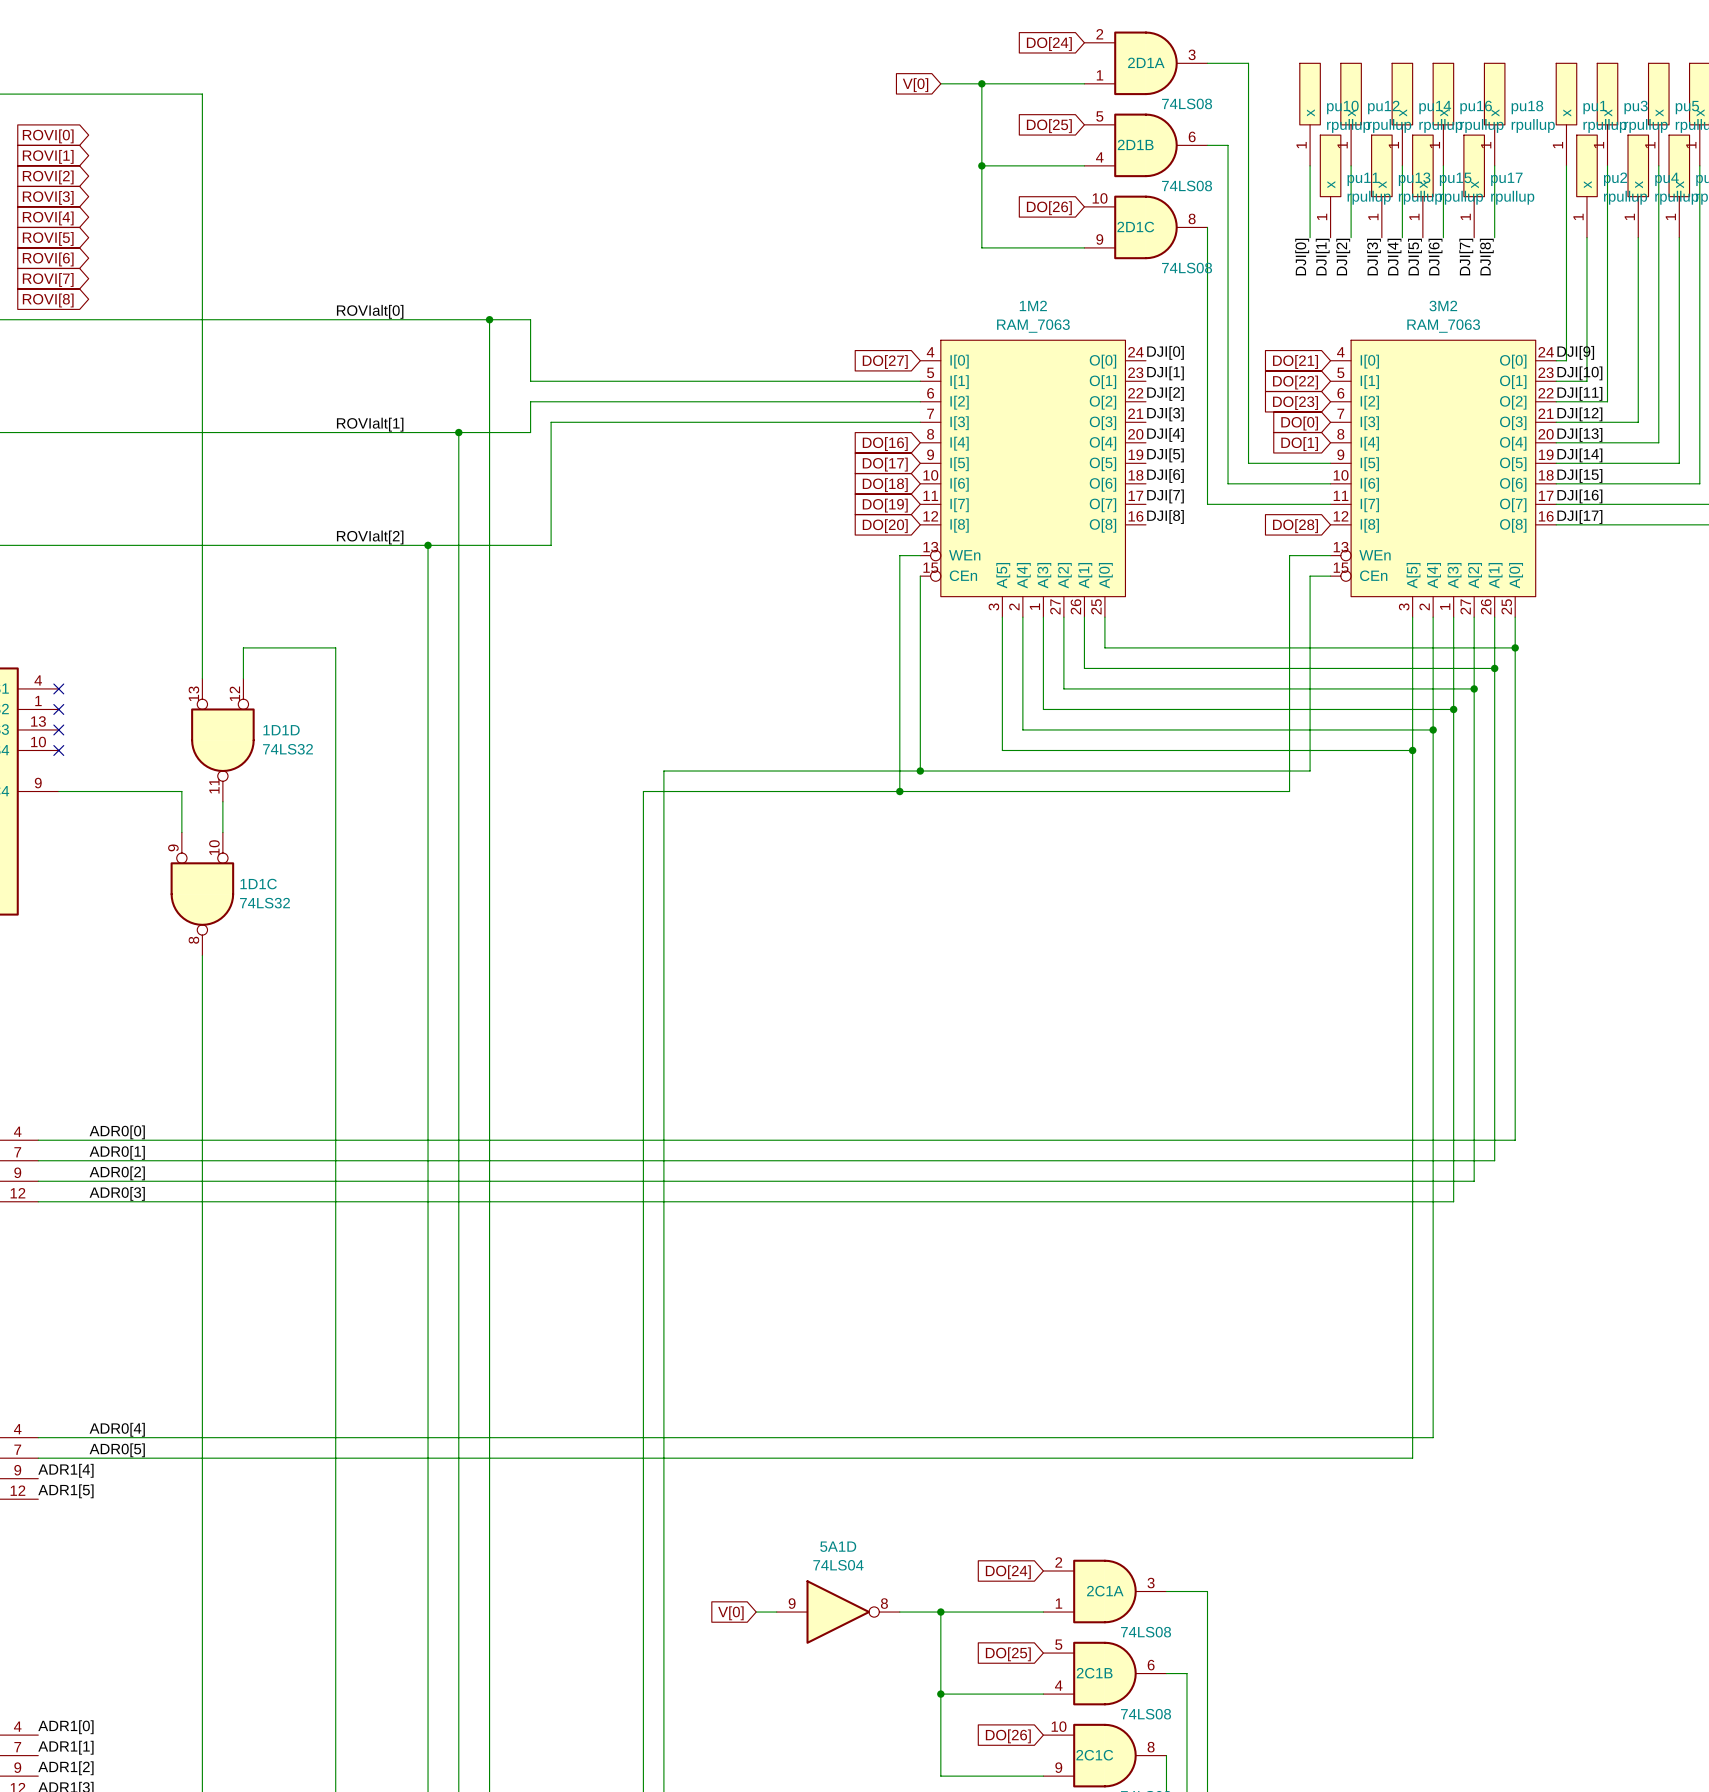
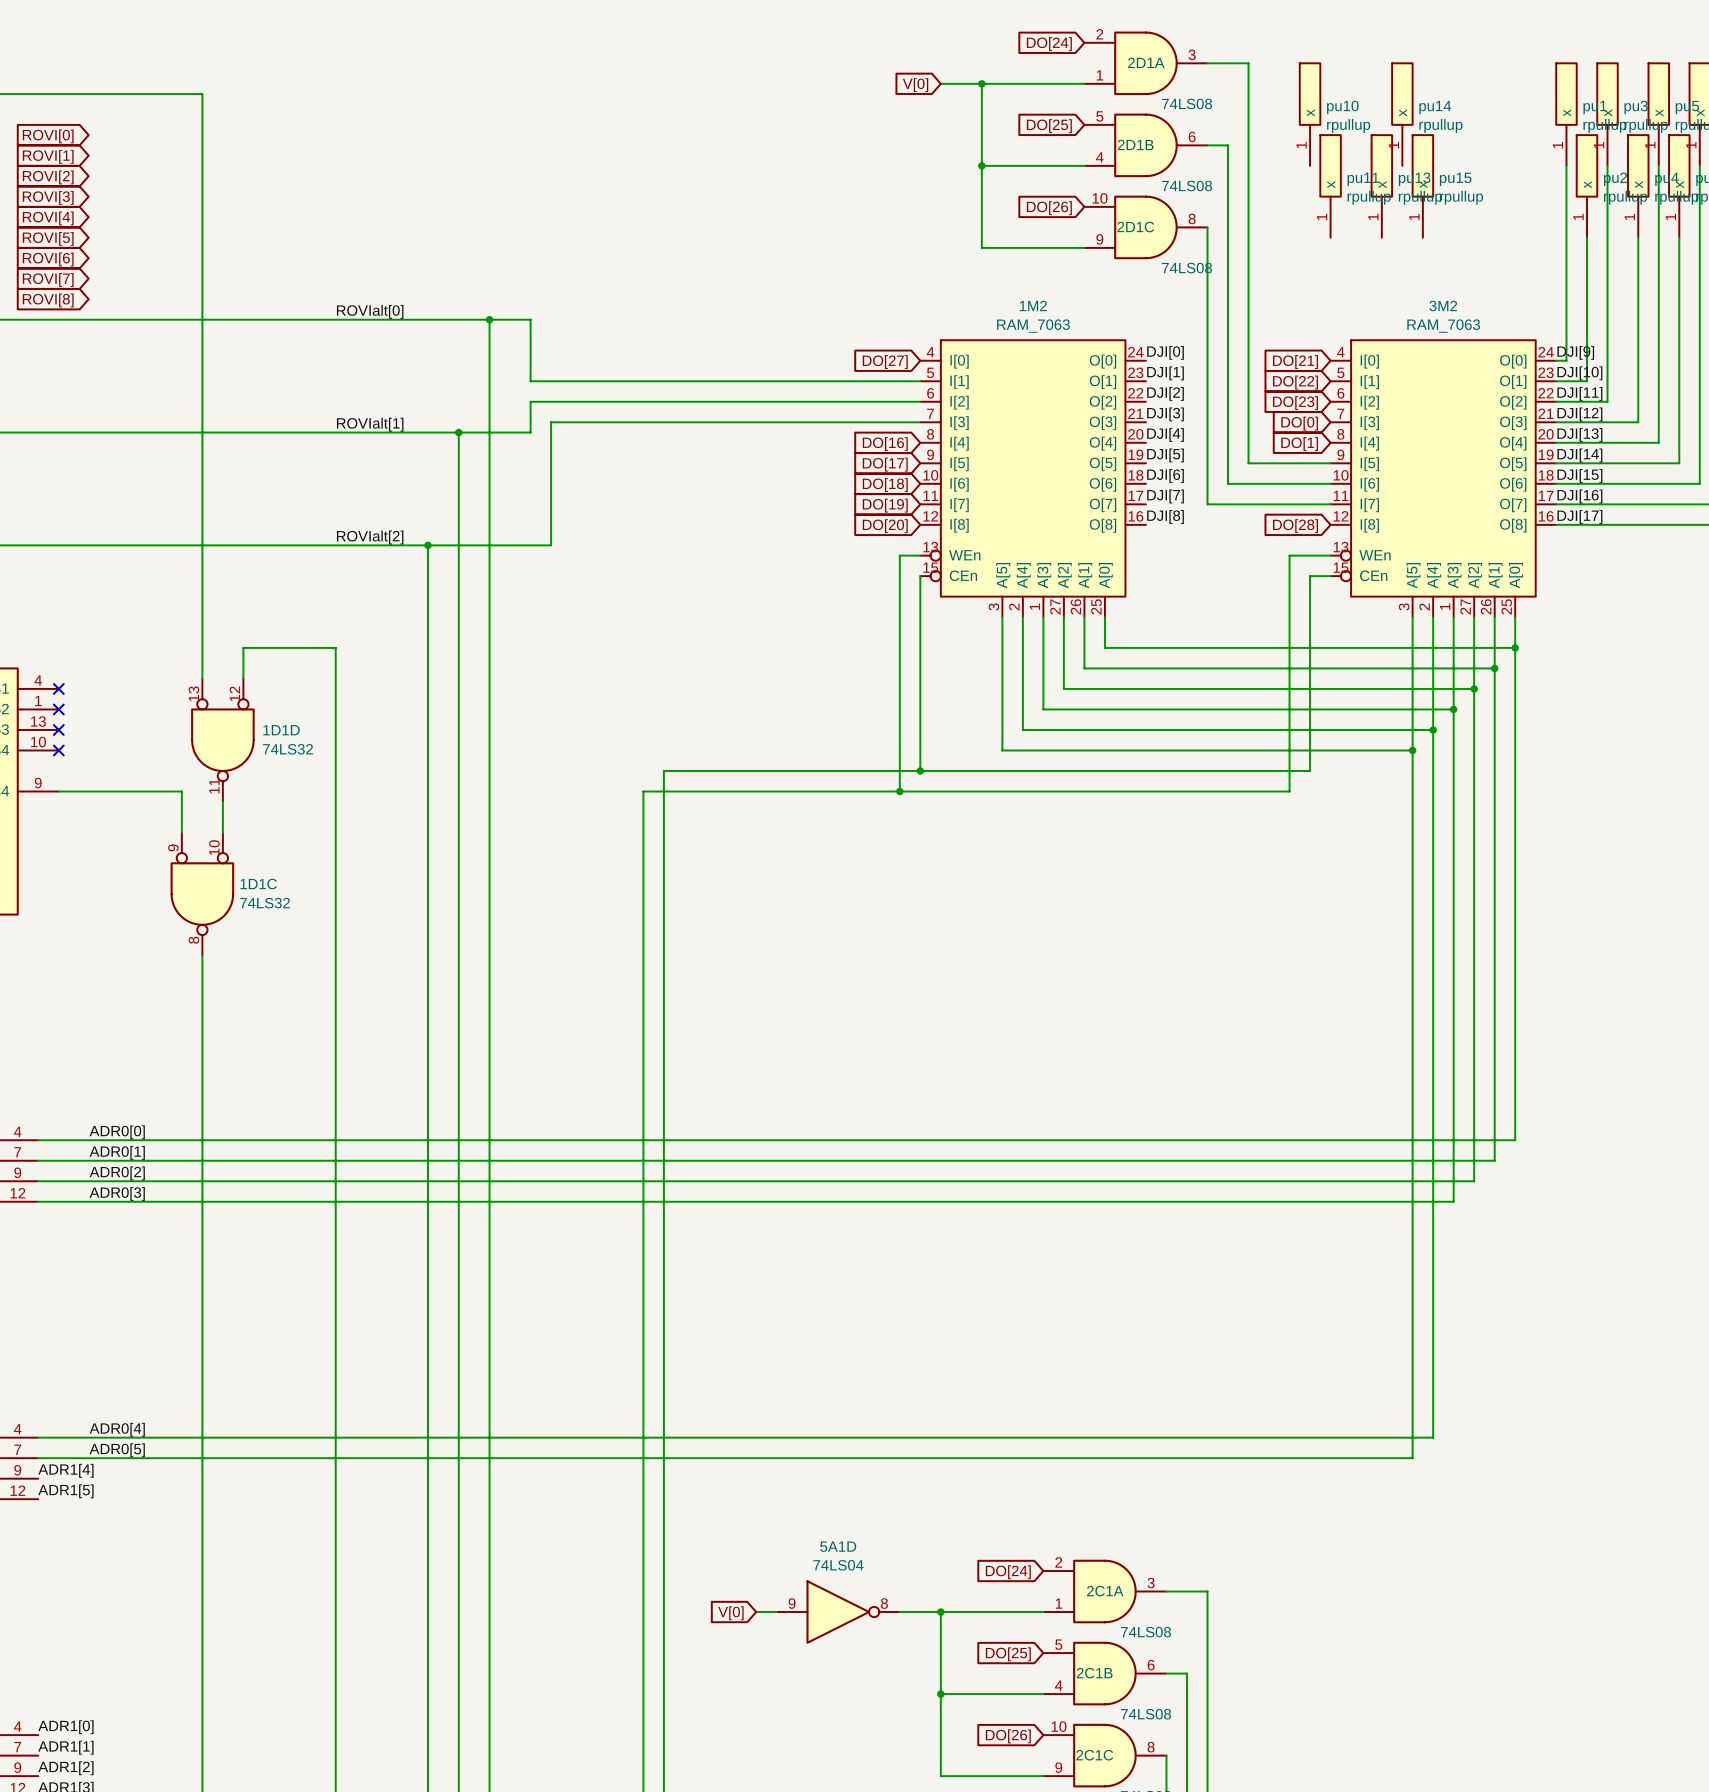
pu12: rpullup (1351, 114) -> none
pu16: rpullup (1443, 114) -> none
pu18: rpullup (1494, 114) -> none
wire: (1310, 165) (1310, 237) -> none
wire: (1351, 165) (1351, 237) -> none
wire: (1402, 165) (1402, 237) -> none
wire: (1443, 165) (1443, 237) -> none
wire: (1494, 165) (1494, 237) -> none
pu17: rpullup (1474, 186) -> none
label: DJI[0] (1302, 257) -> none
label: DJI[1] (1322, 257) -> none
label: DJI[2] (1343, 257) -> none
label: DJI[3] (1373, 257) -> none
label: DJI[4] (1394, 257) -> none
label: DJI[5] (1415, 257) -> none
label: DJI[6] (1435, 257) -> none
label: DJI[7] (1466, 257) -> none
label: DJI[8] (1486, 257) -> none

